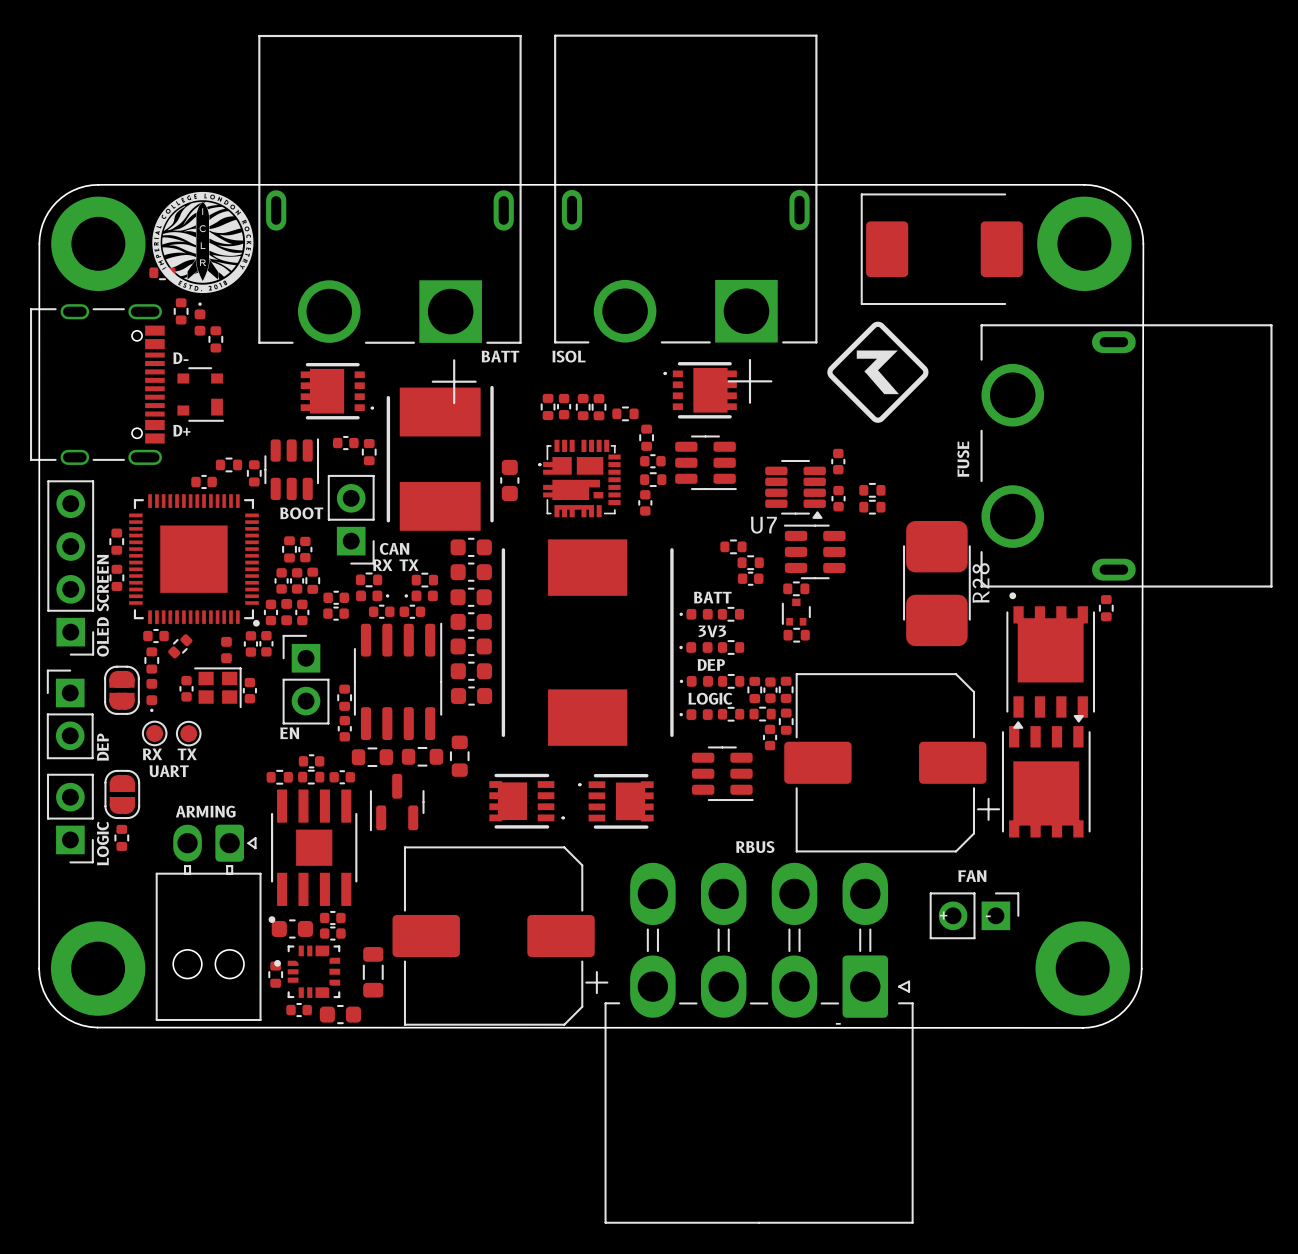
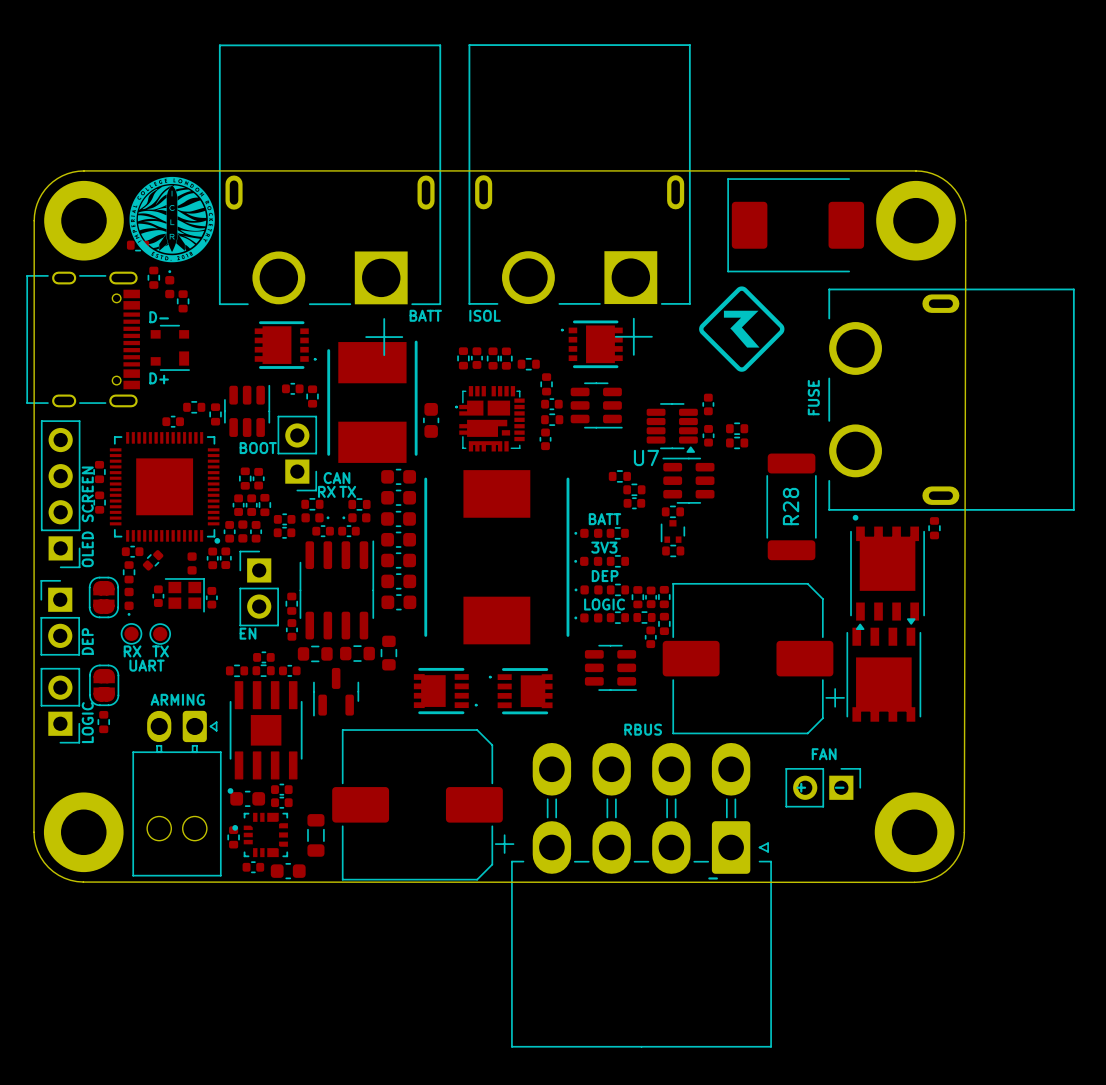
R28 footprint: [903, 520, 971, 647] -> [766, 453, 817, 561]
R28 name position: R28 (981, 583) -> R28 (791, 506)

